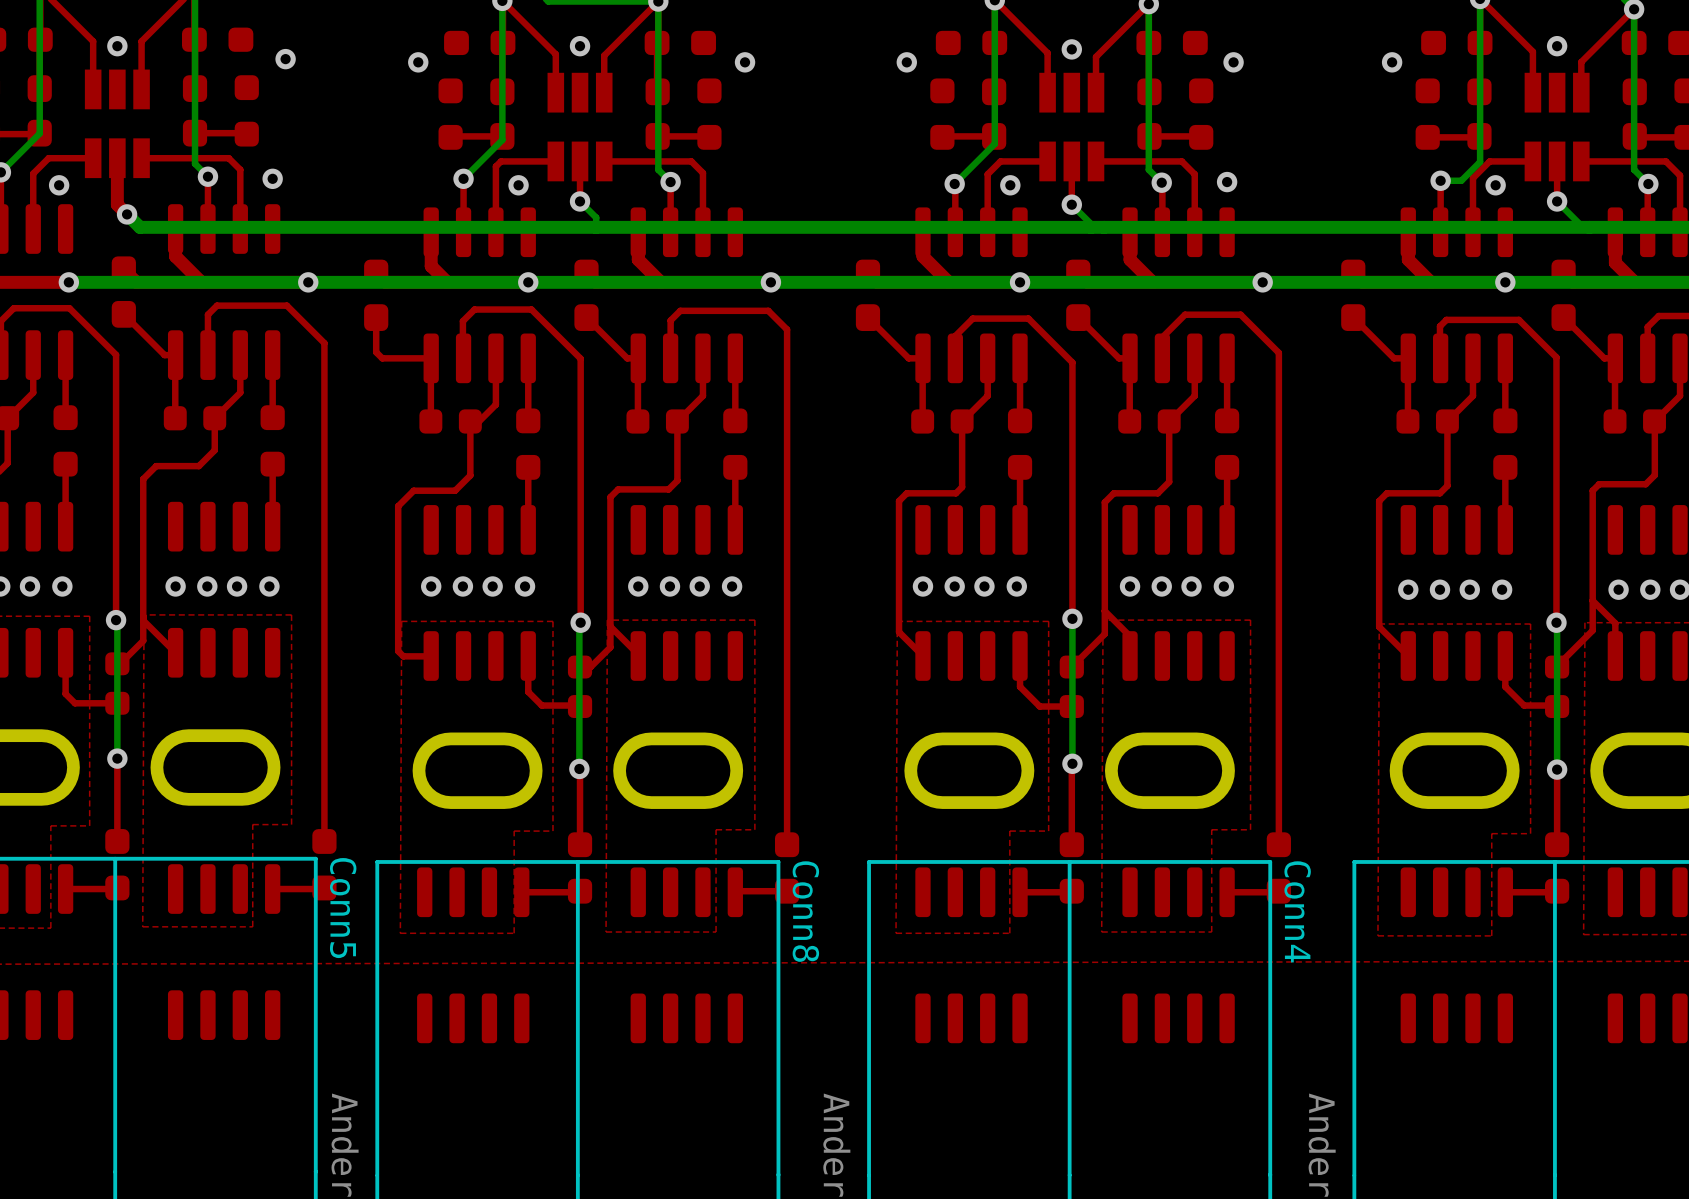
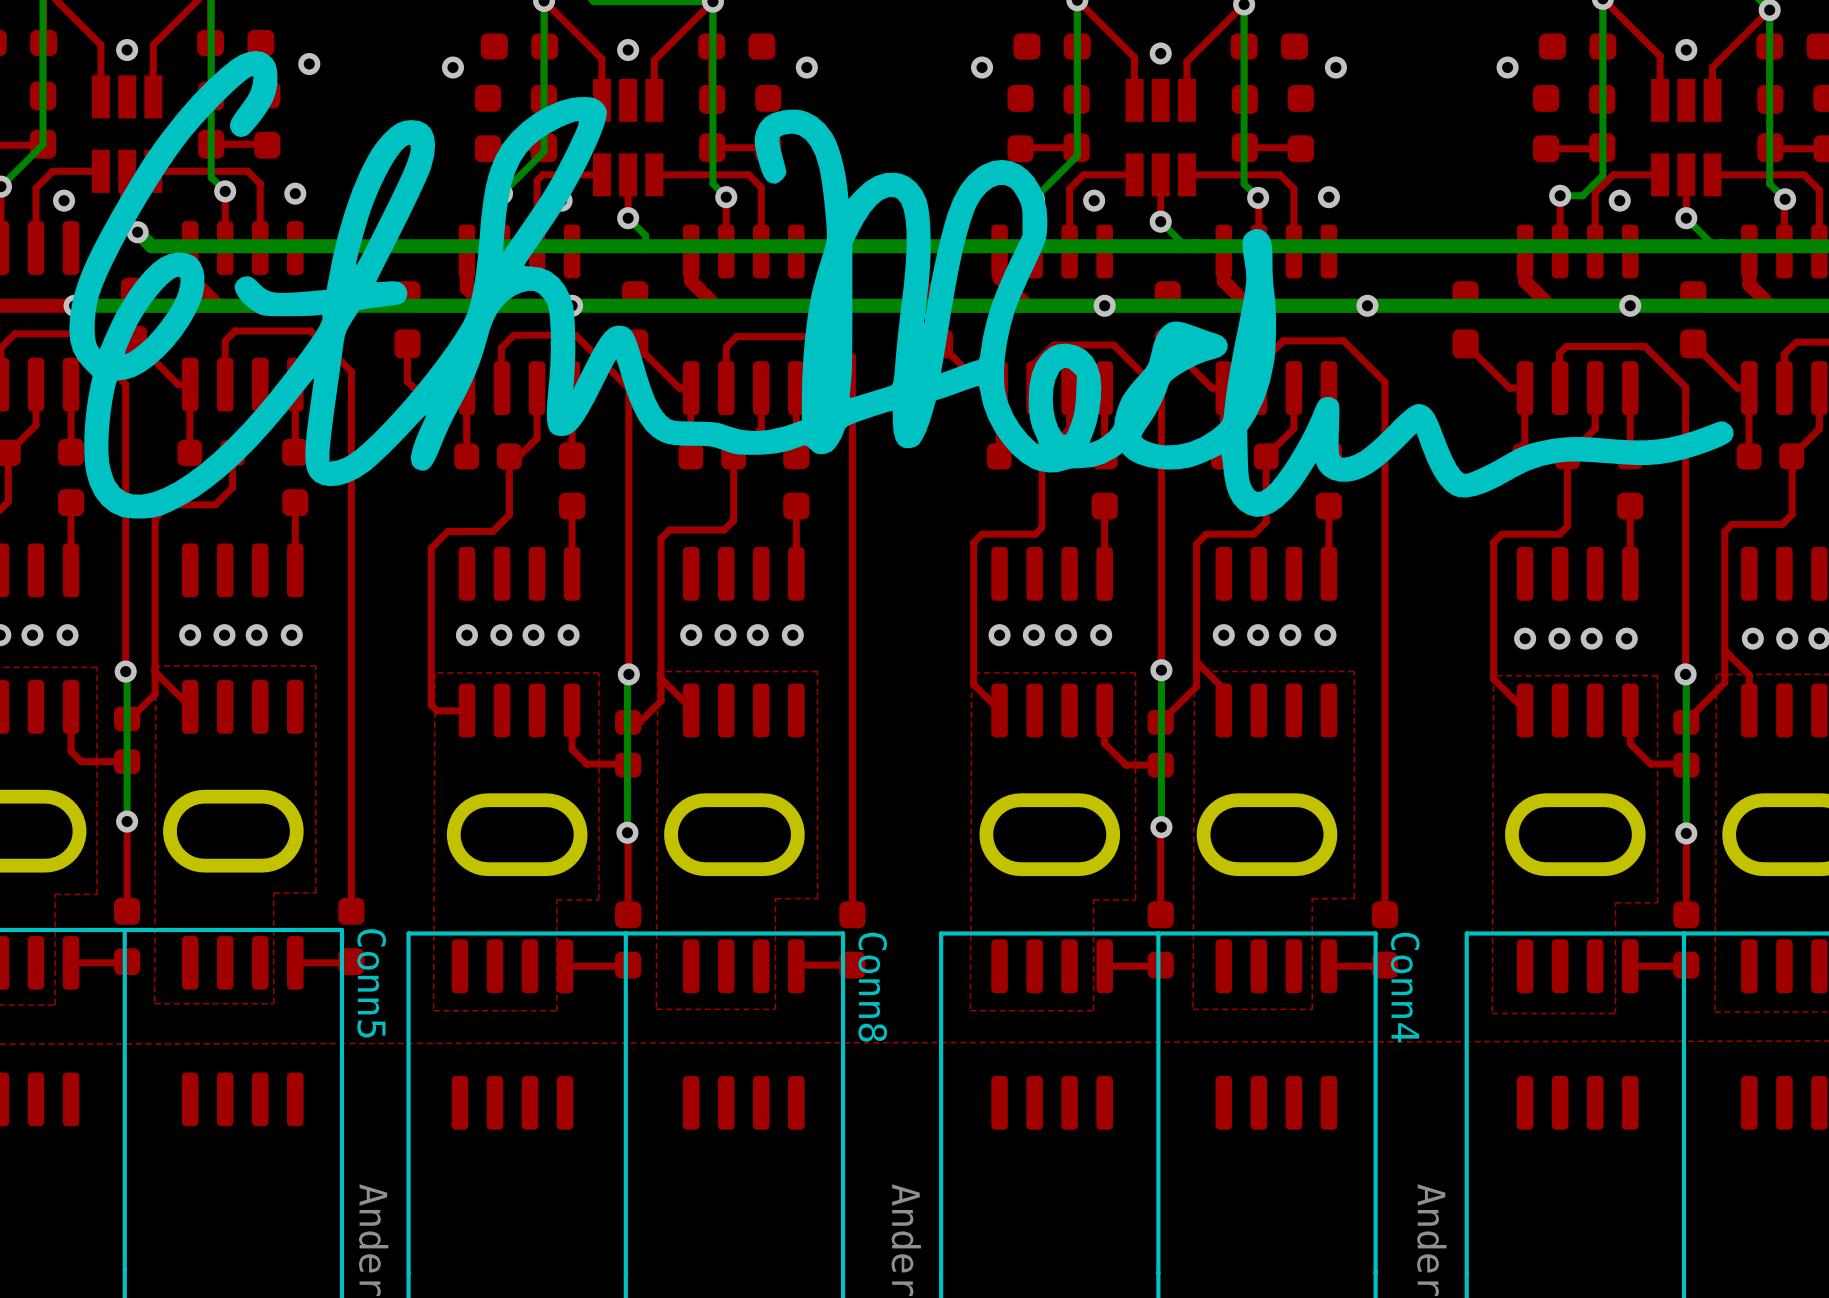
drawing: none -> [69, 50, 1734, 519]

